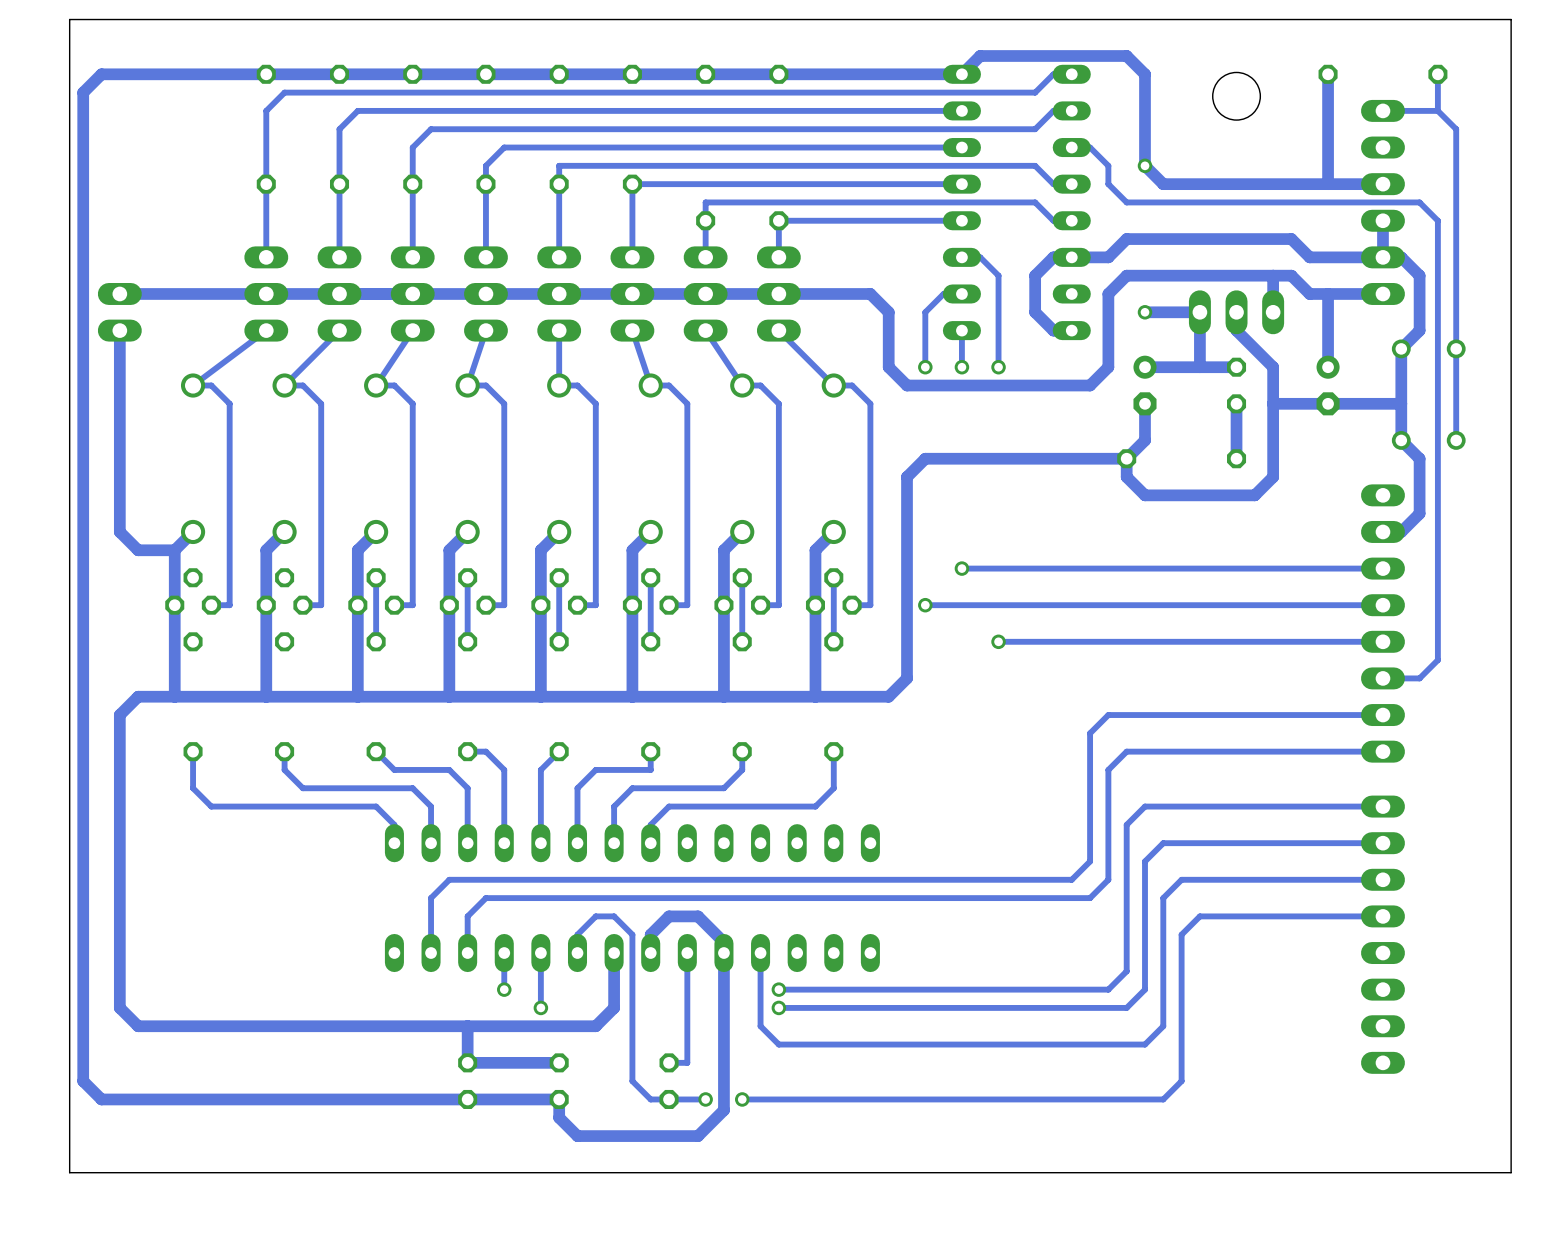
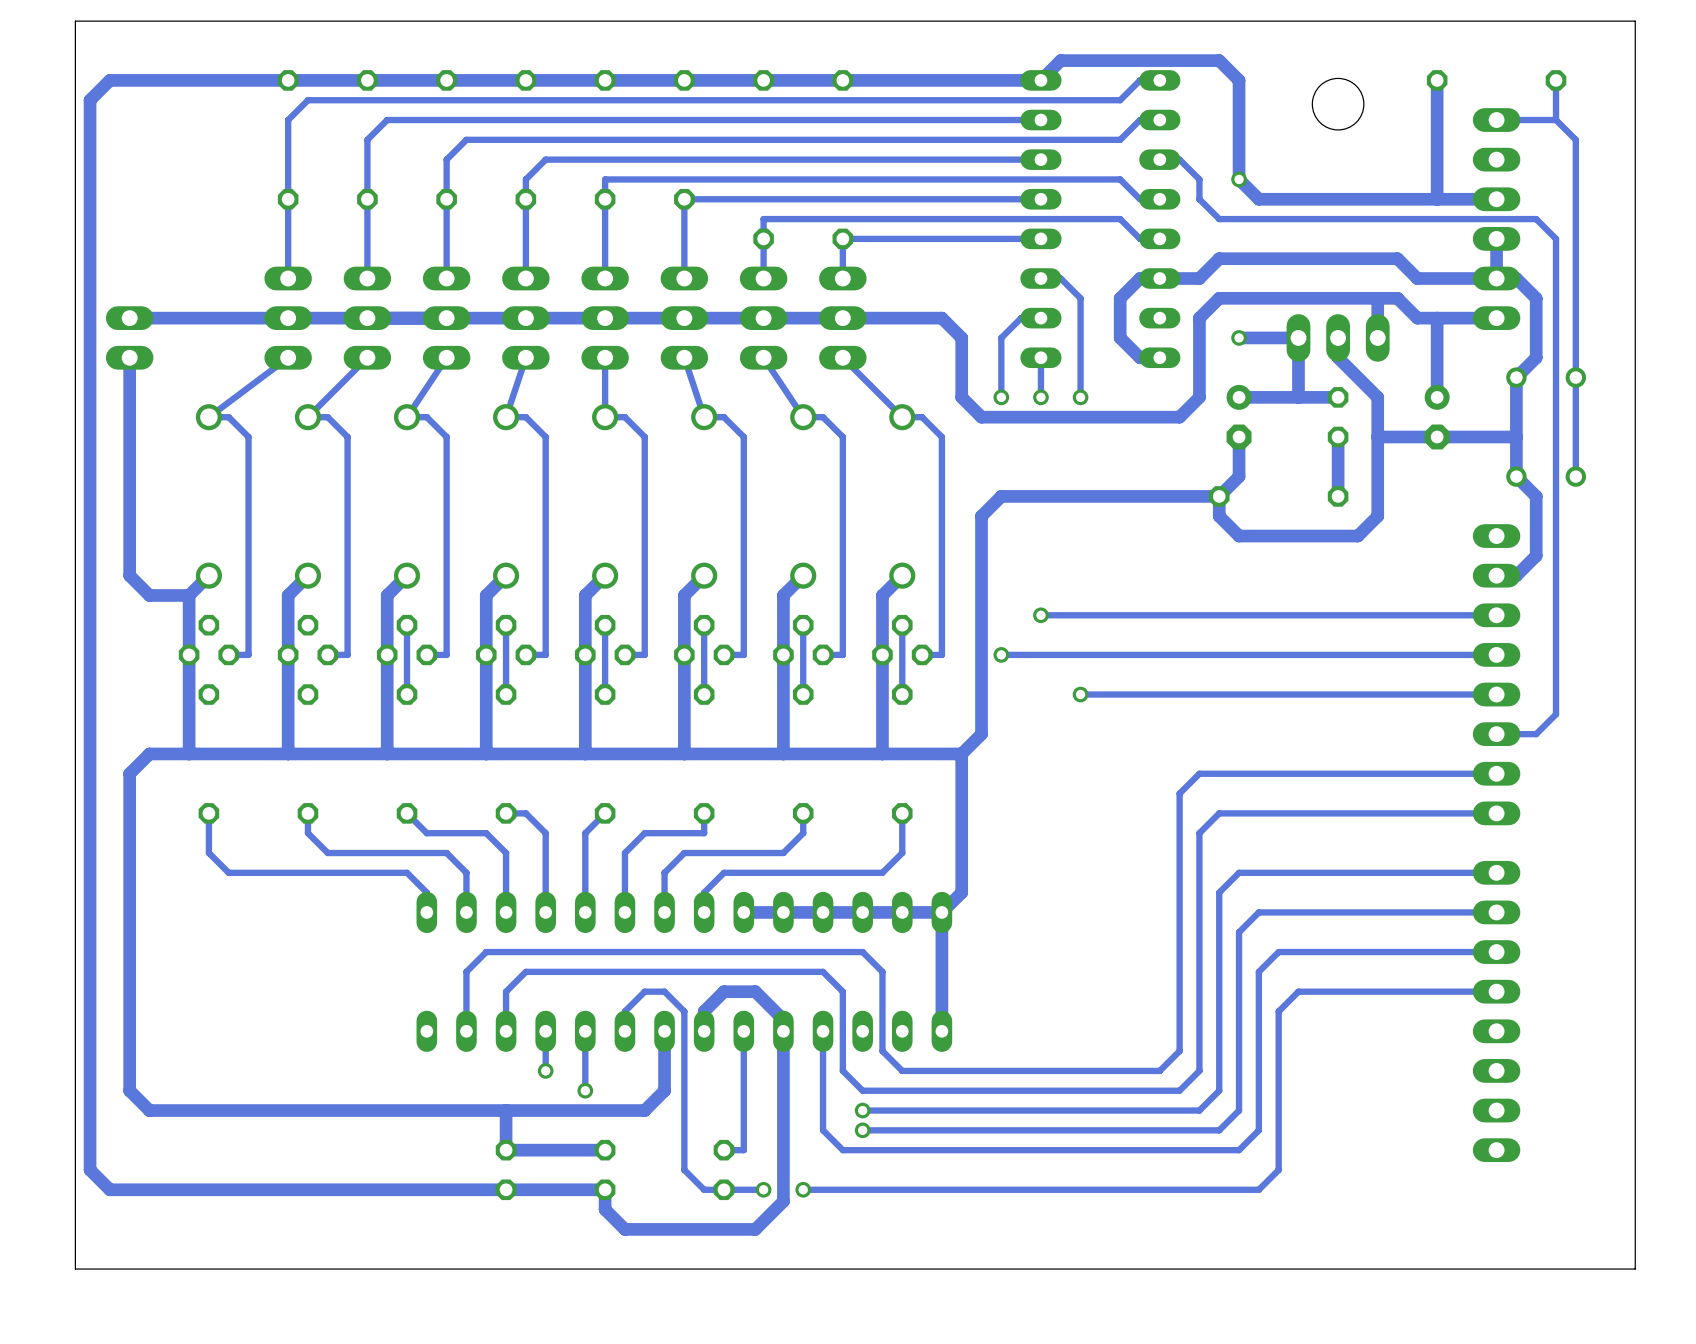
track: none -> (961, 753) (961, 892) (941, 912)
track: none -> (941, 912) (743, 912)
track: none -> (941, 912) (941, 1031)
track: (1090, 861) (1071, 879) (797, 879) -> none
track: (1108, 879) (1090, 898) (760, 898) -> none
track: (1126, 971) (1108, 989) (1071, 989) -> (1179, 932) (1179, 1051) (1159, 1070)
track: none -> (1219, 1051) (1219, 1090) (1199, 1110) (862, 1110)
via: (778, 989) -> none
track: (833, 989) (778, 989) -> (902, 1070) (882, 1051) (882, 971) (862, 952)
track: (1144, 989) (1126, 1007) (1090, 1007) -> (1199, 952) (1199, 1070) (1179, 1090)
via: (778, 1007) -> none
track: (797, 1007) (778, 1007) -> (862, 1090) (842, 1070) (842, 991) (823, 971)
track: (760, 1026) (778, 1044) (797, 1044) -> (823, 1110) (823, 1130) (842, 1150) (1239, 1150) (1258, 1130) (1258, 1110)
via: none -> (862, 1110)
track: (1163, 1026) (1144, 1044) (1126, 1044) -> (1239, 1070) (1239, 1110) (1219, 1130)
via: none -> (862, 1130)

